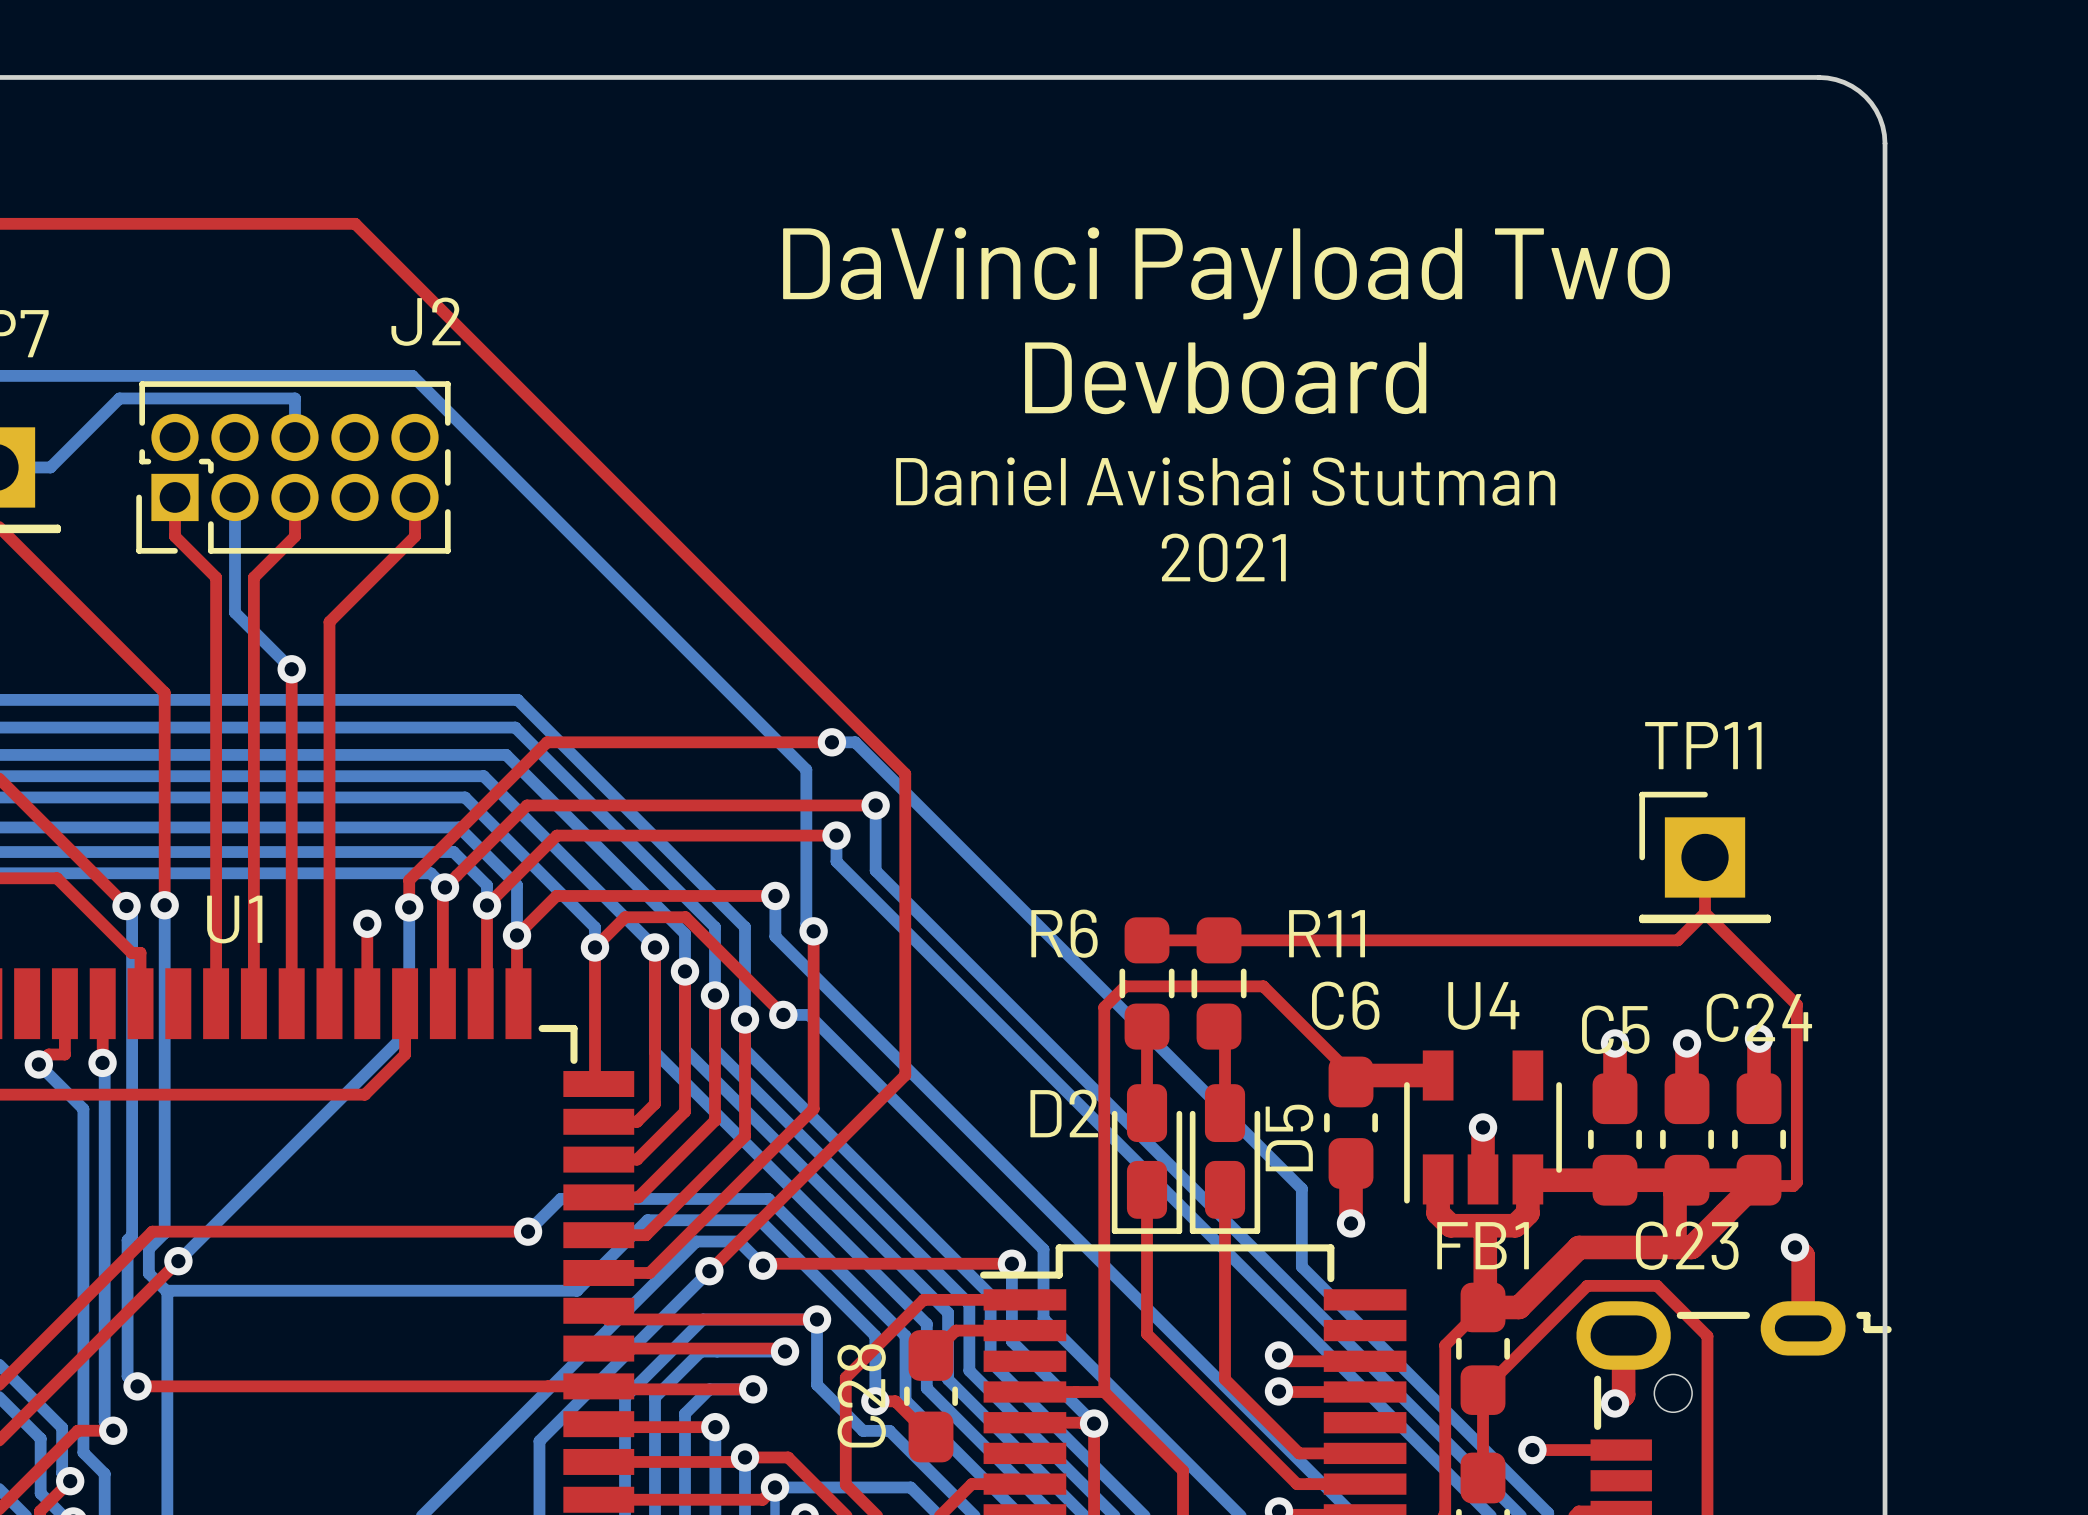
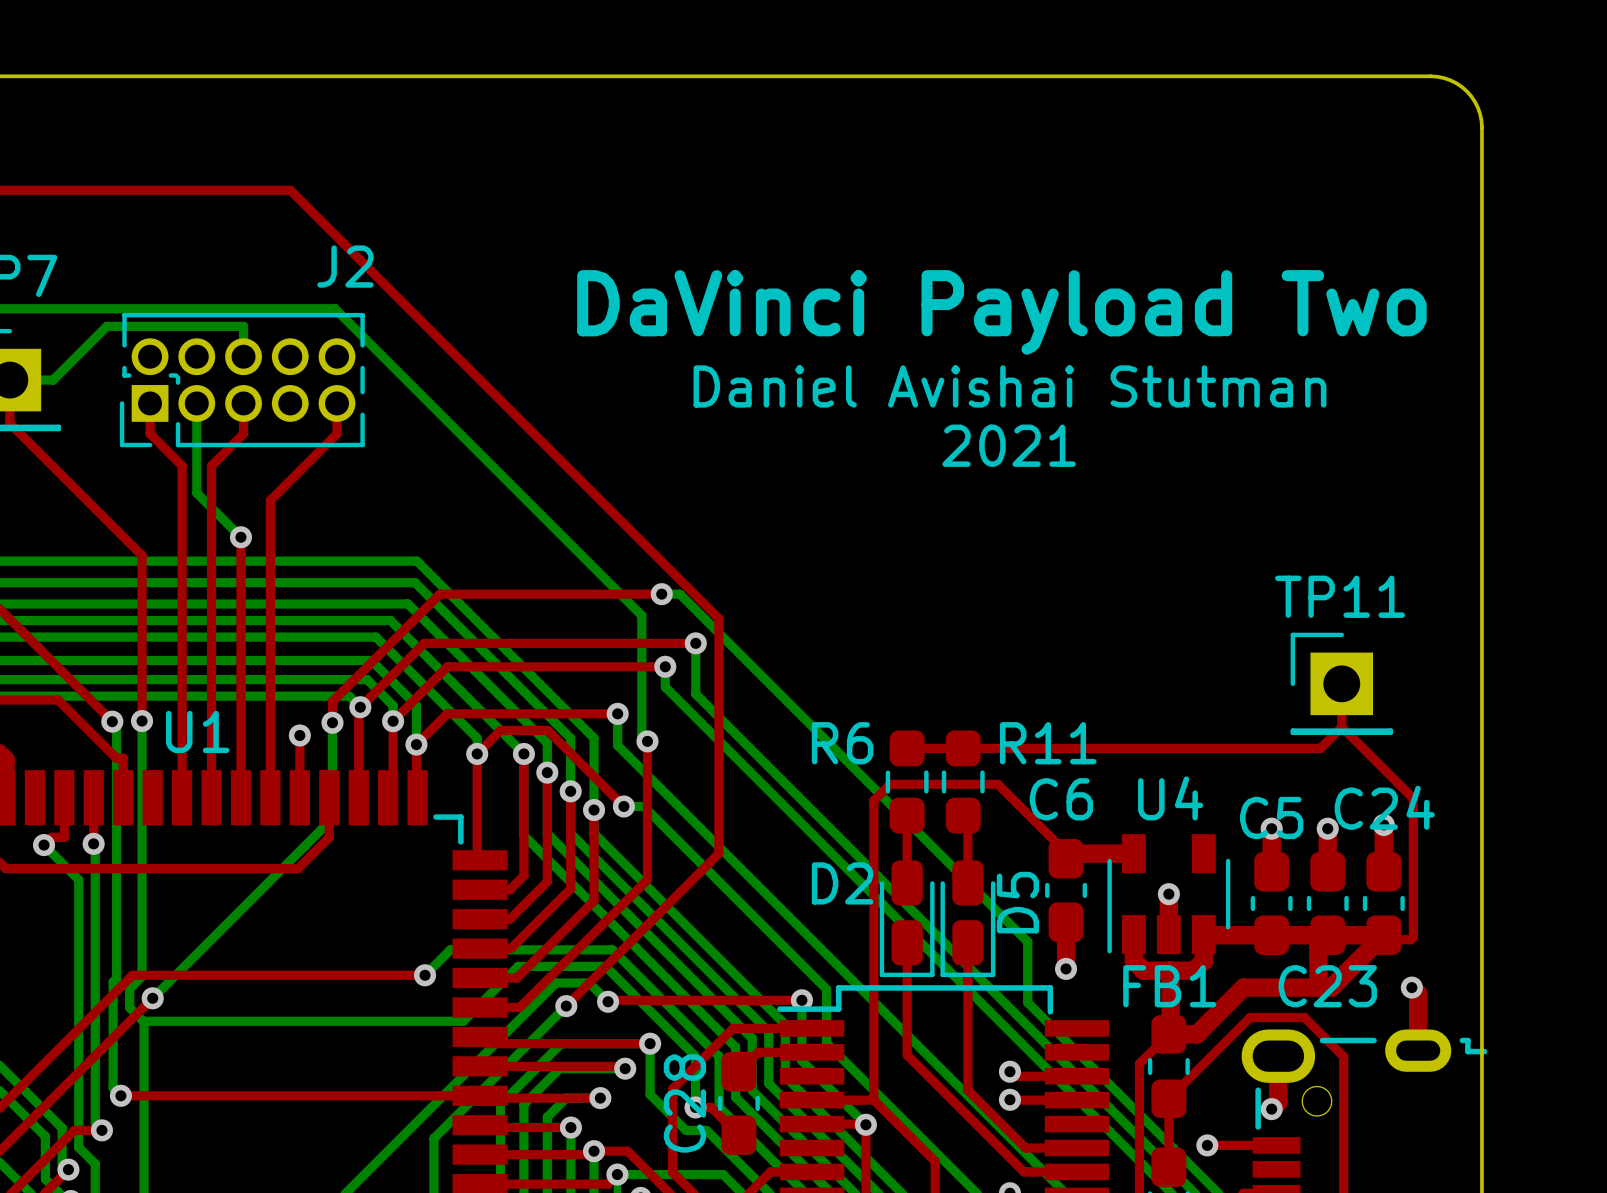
text: DaVinci Payload Two (1226, 273) -> none
text: Devboard (1225, 378) -> DaVinci Payload Two (1001, 312)
text position: Daniel Avishai Stutman (1225, 481) -> Daniel Avishai Stutman (1009, 386)
text position: 2021 (1223, 557) -> 2021 (1009, 445)

